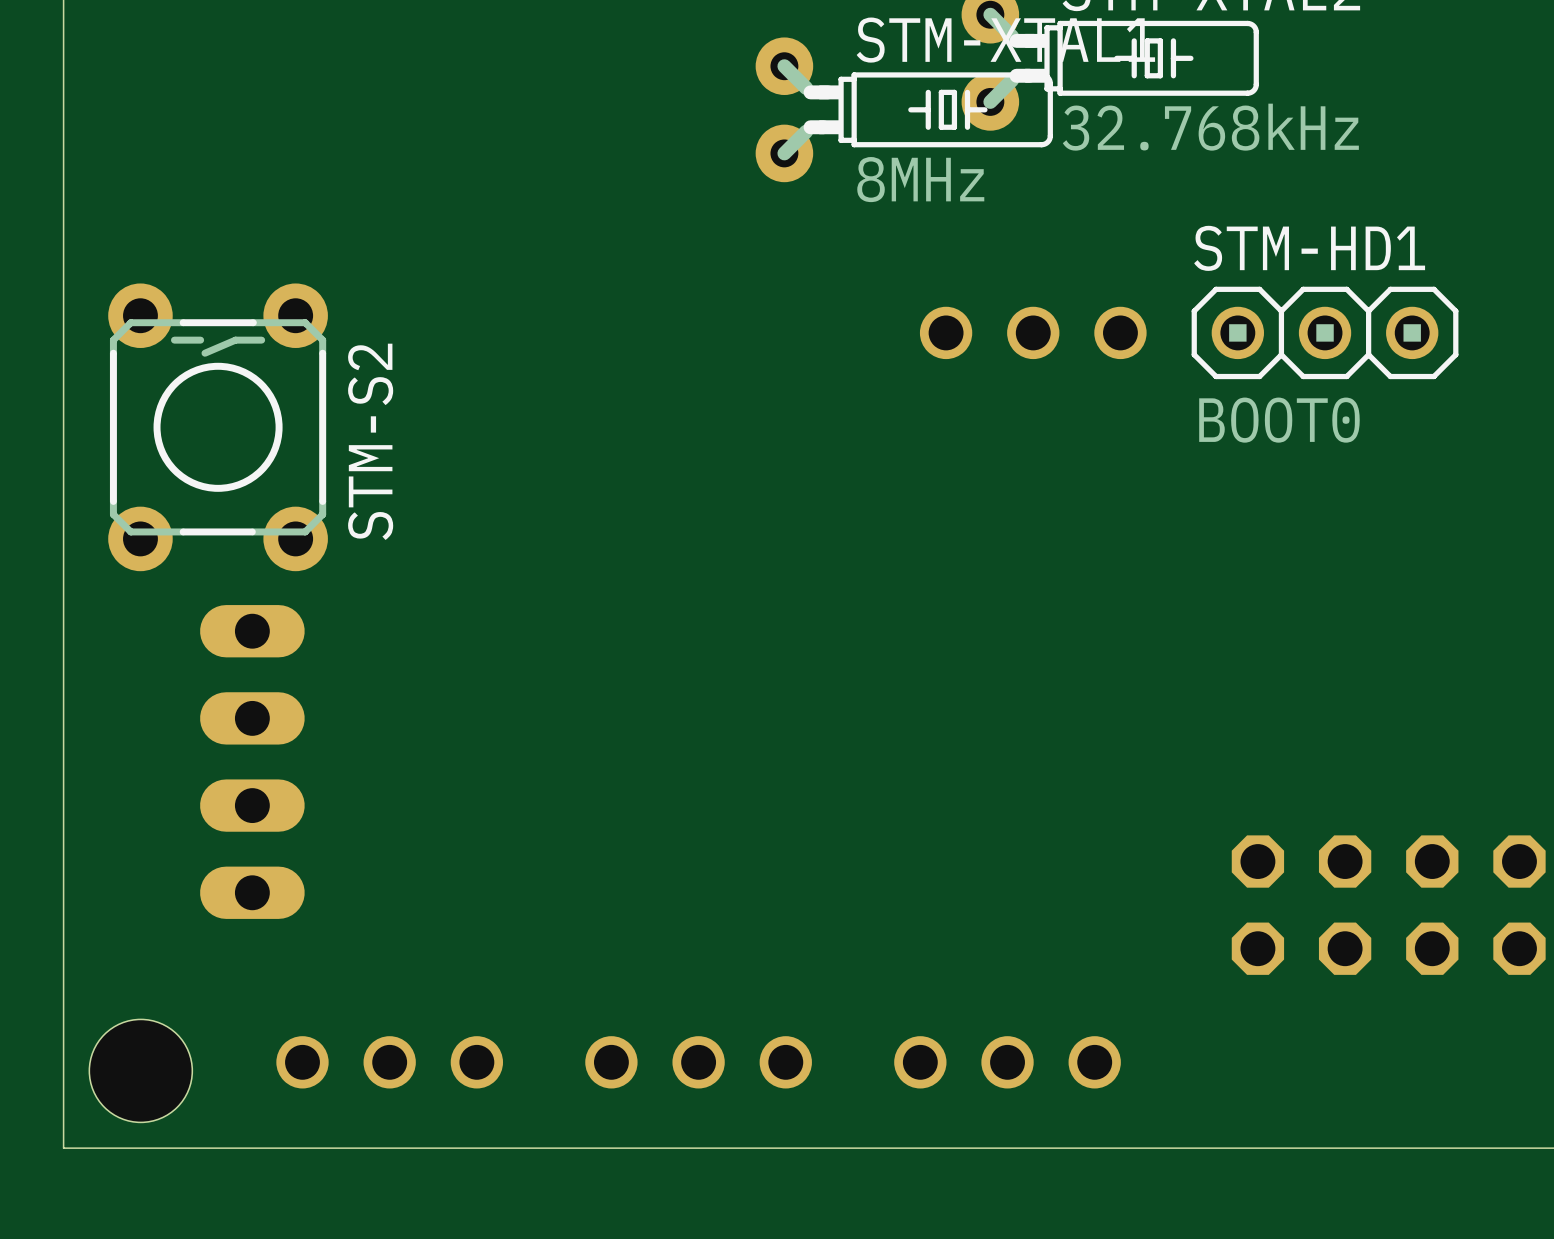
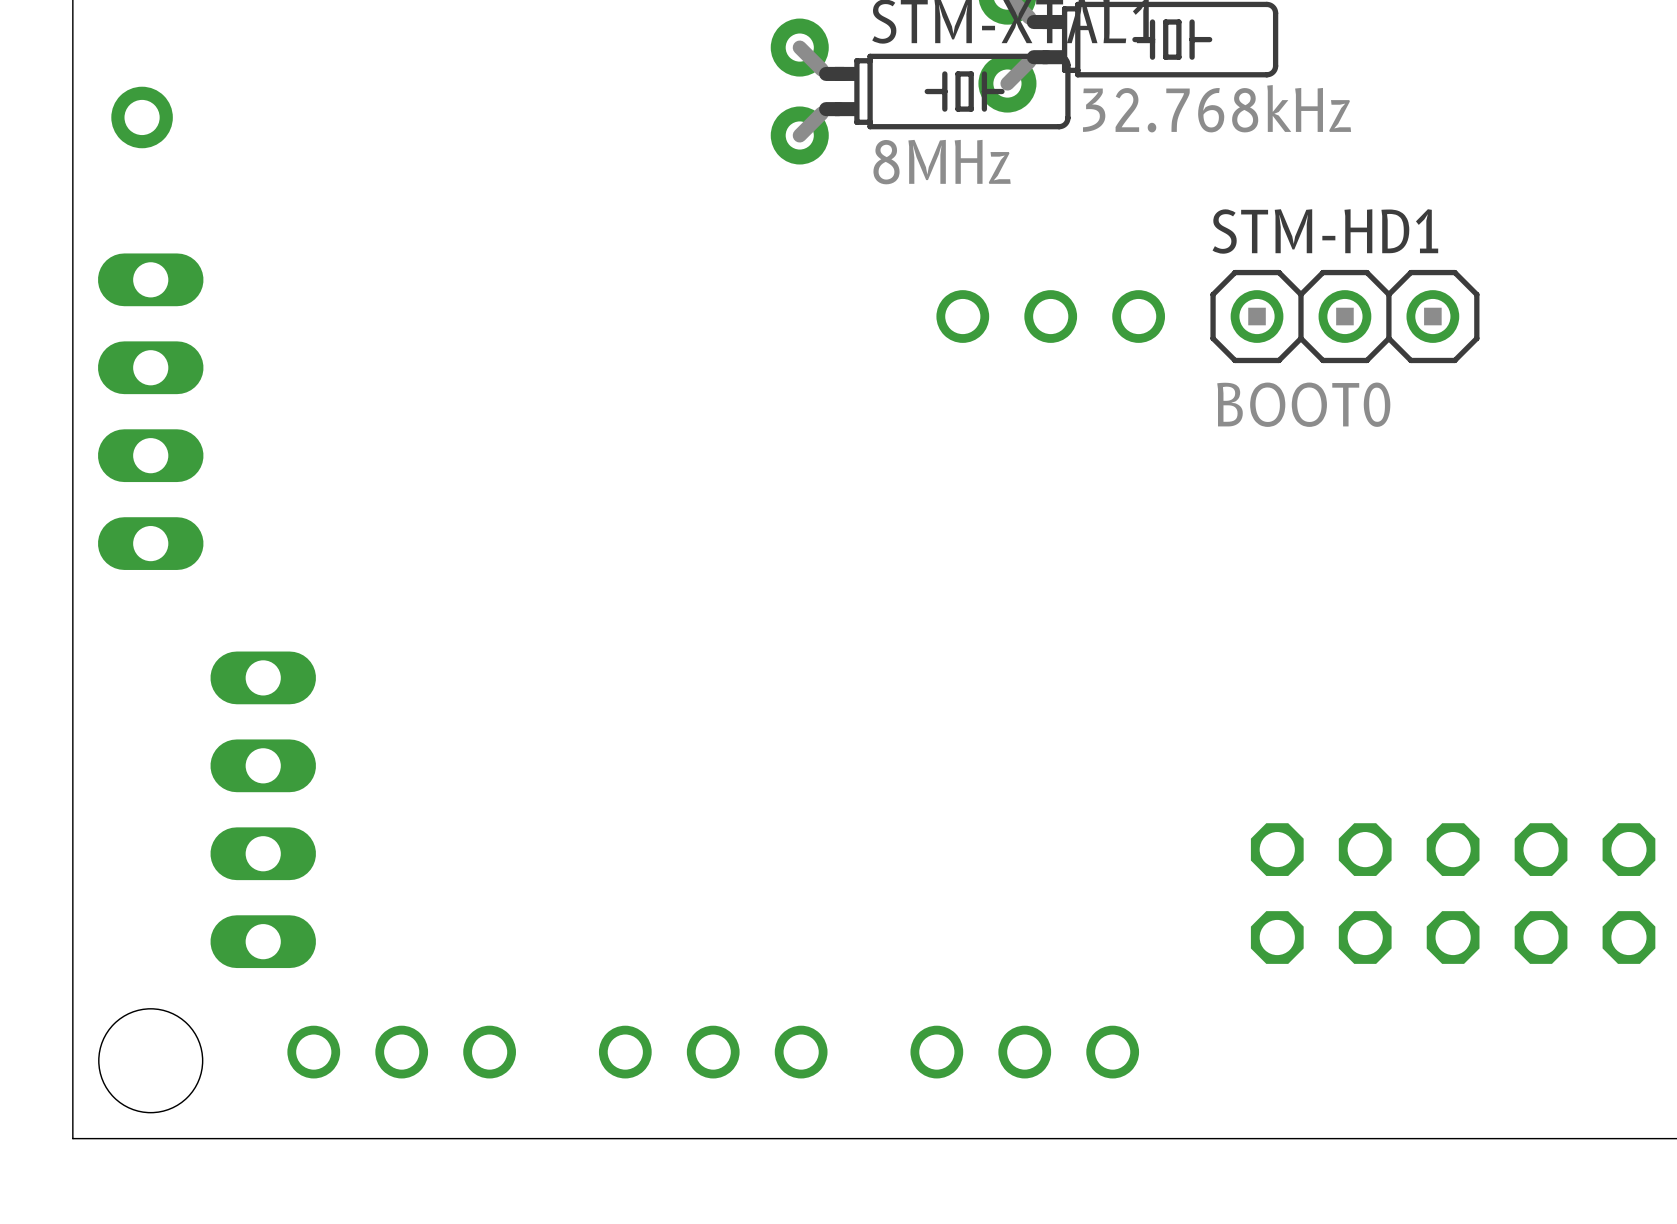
part: none -> (142, 117)
part: none -> (150, 411)
STM-S2: (218, 427) -> none
part position: (252, 761) -> (263, 809)

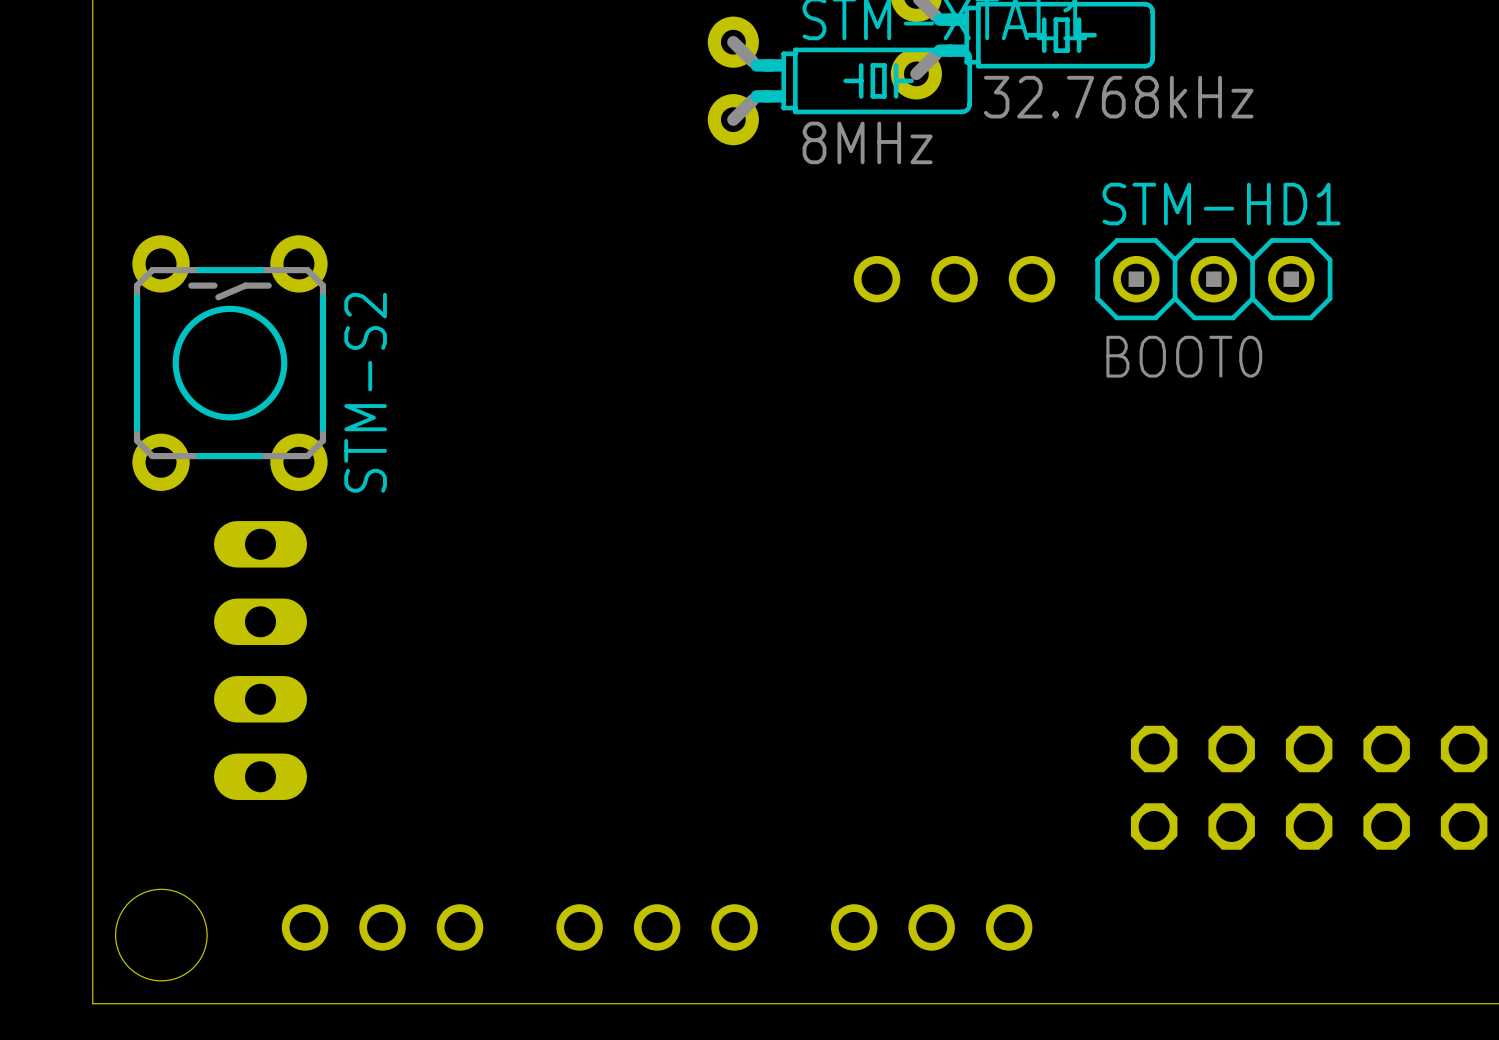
part: (142, 117) -> none
part: (150, 411) -> none
STM-S2: none -> (230, 363)
part position: (263, 809) -> (260, 660)

